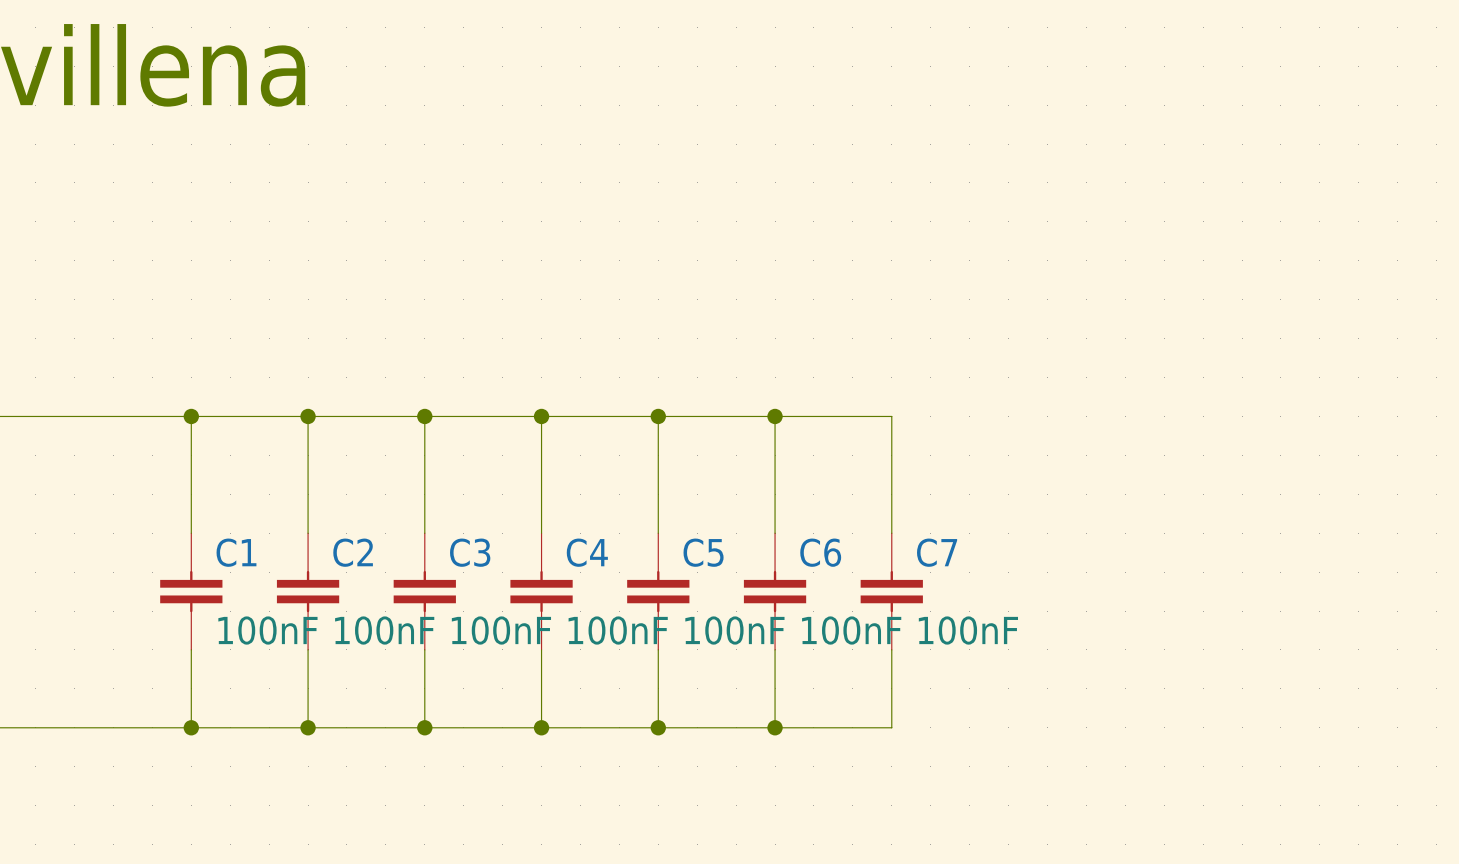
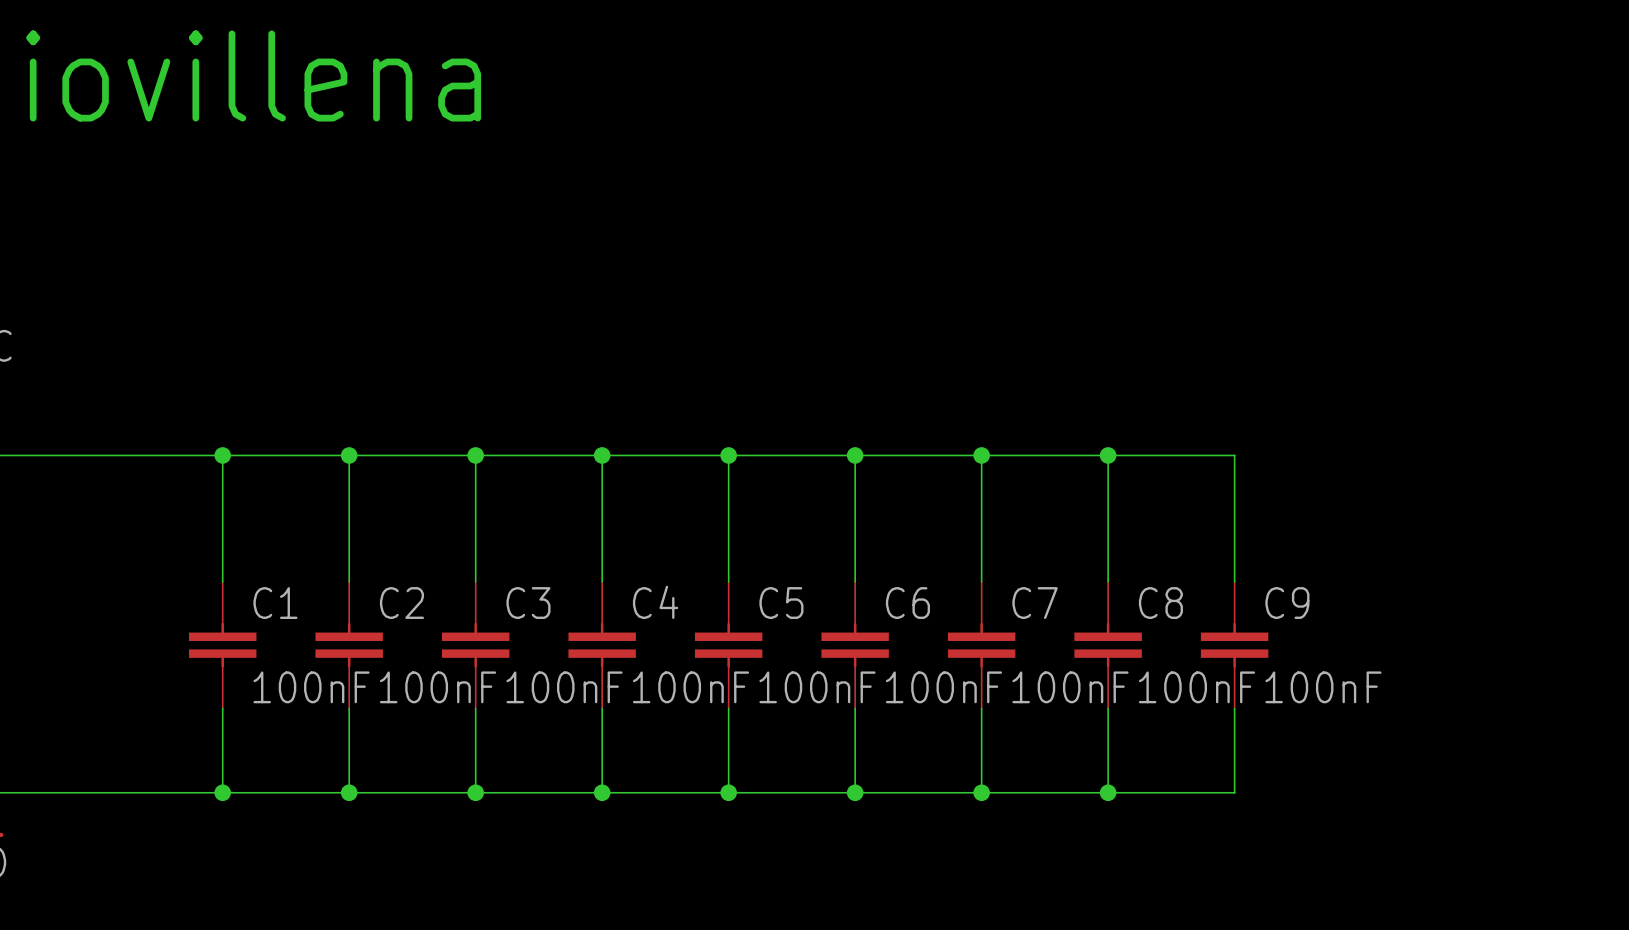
wire: none -> (981, 455) (1234, 455) (1234, 581)
junction: none -> (981, 455)
wire: none -> (1108, 455) (1108, 581)
junction: none -> (1108, 455)
C8: none -> 100nF (1108, 645)
C9: none -> 100nF (1234, 645)
wire: none -> (1108, 708) (1108, 792)
wire: none -> (1234, 708) (1234, 792) (981, 792)
junction: none -> (981, 792)
junction: none -> (1108, 792)

